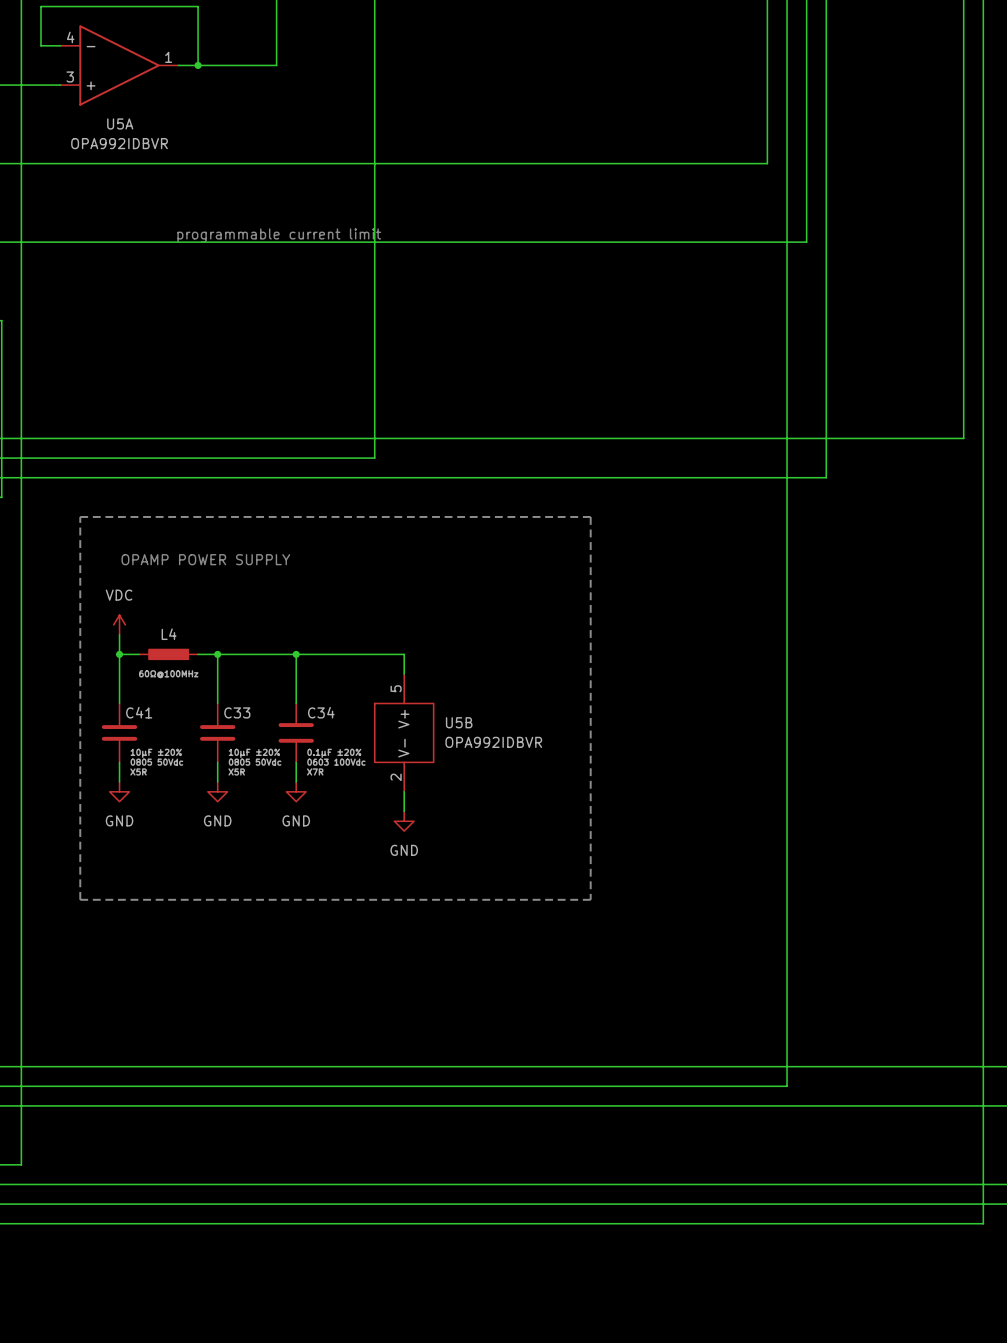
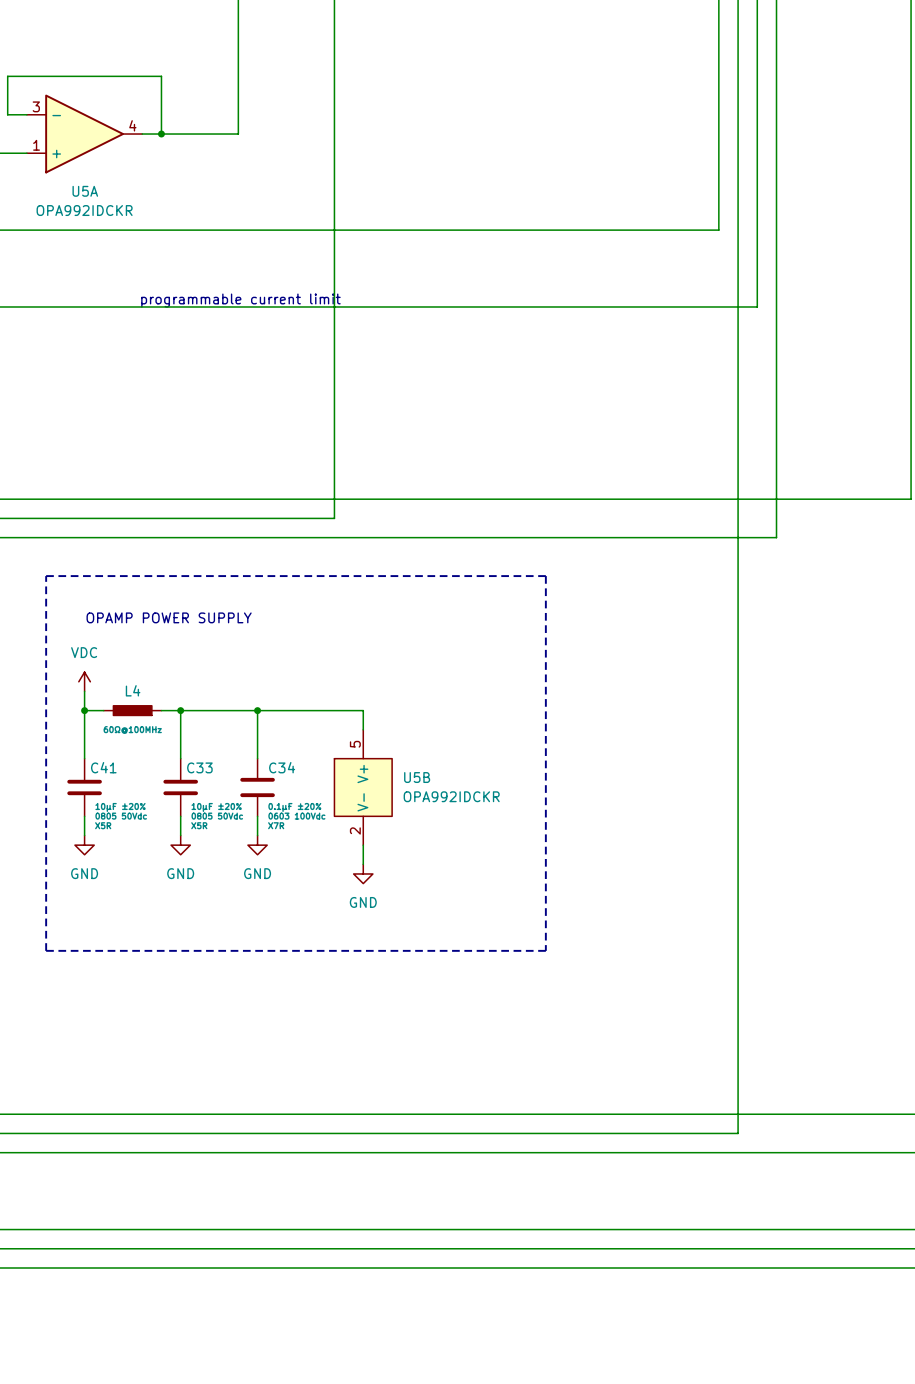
U5A pin number: 4 (70, 37) -> 3 (36, 106)
U5A pin number: 1 (168, 57) -> 4 (132, 125)
U5A pin number: 3 (70, 76) -> 1 (36, 145)
U5A value: OPA992IDBVR (119, 143) -> OPA992IDCKR (84, 210)
U5B value: OPA992IDBVR (493, 742) -> OPA992IDCKR (451, 796)

